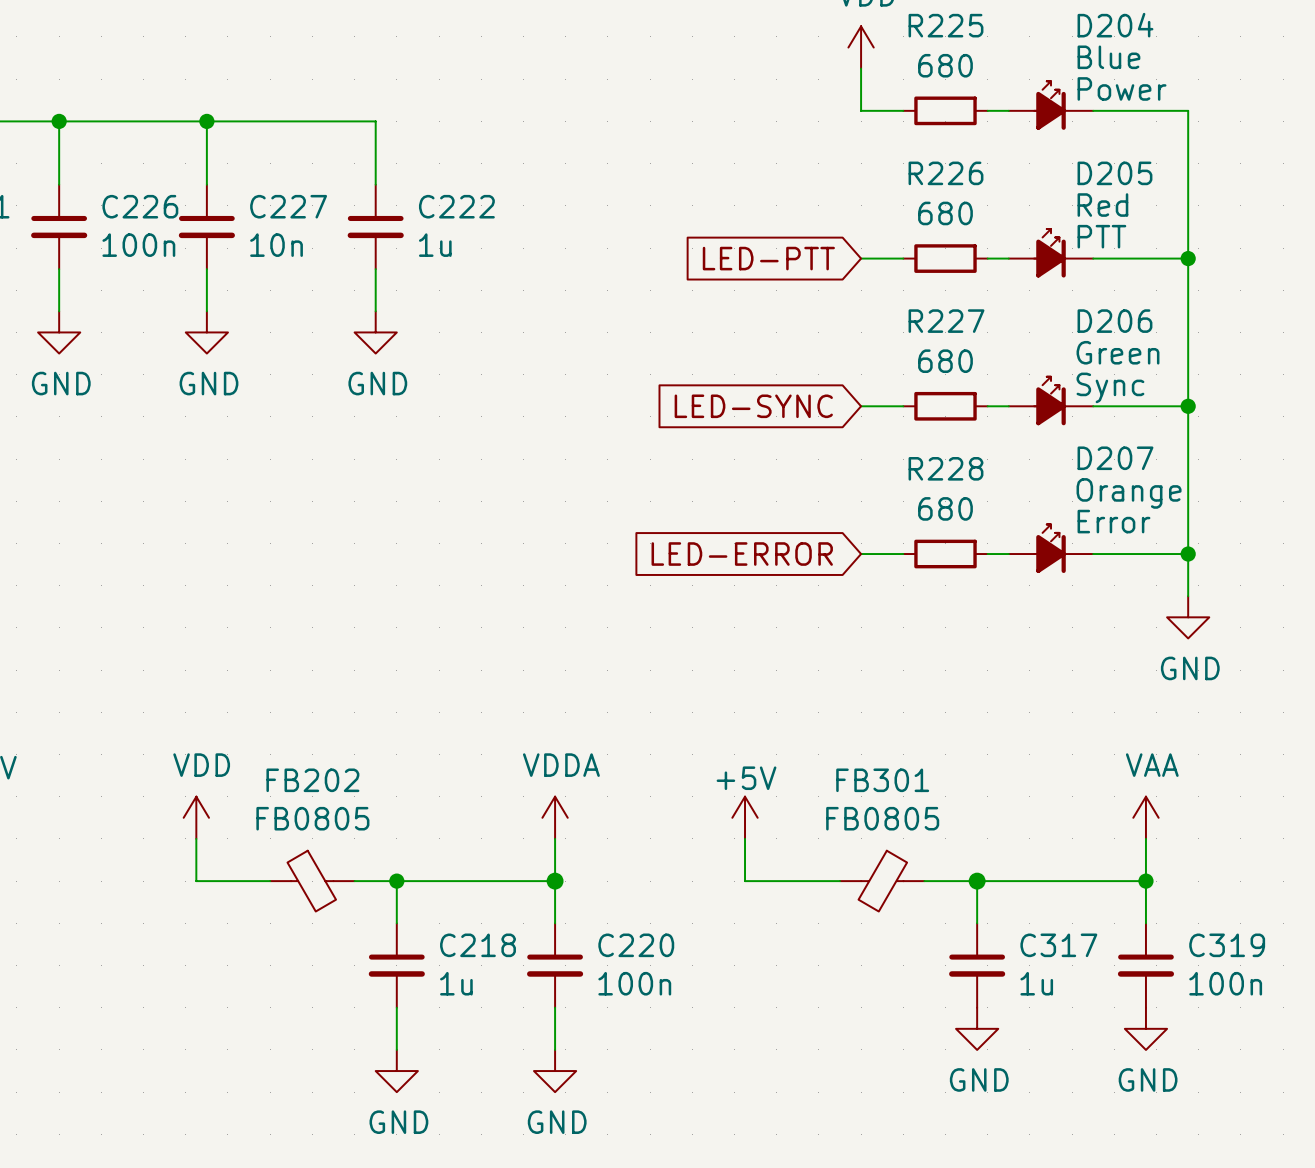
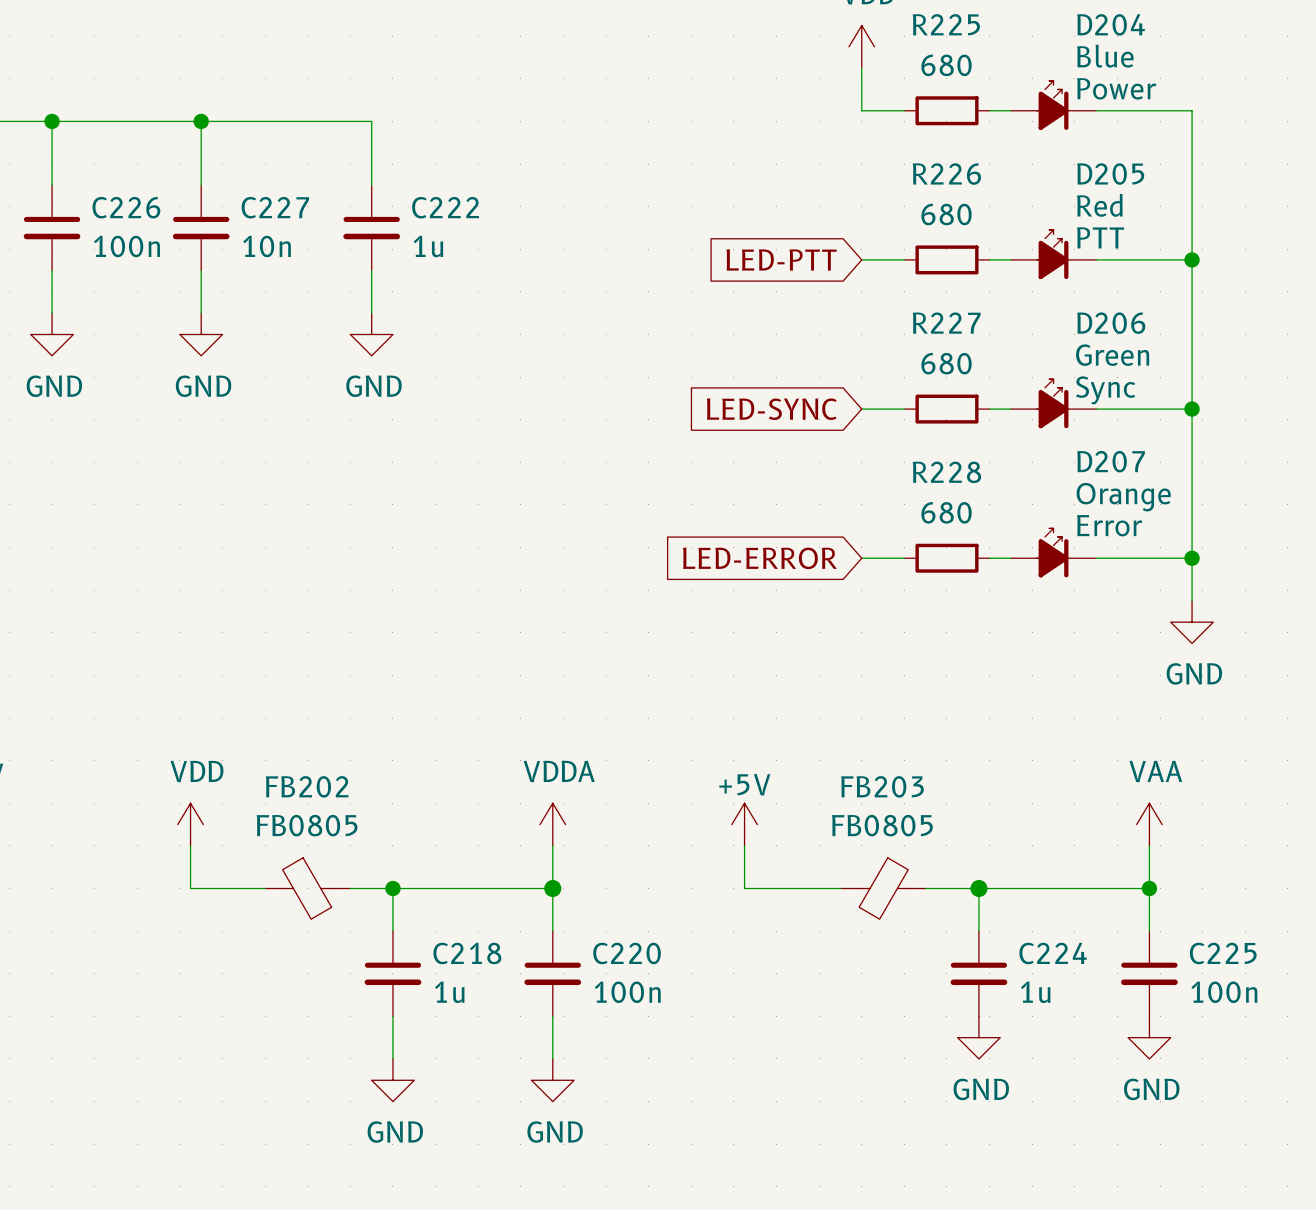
FB301 name: FB301 (882, 780) -> FB203 (882, 786)
C317 name: C317 (1058, 945) -> C224 (1053, 953)
C319 name: C319 (1227, 945) -> C225 (1223, 953)

